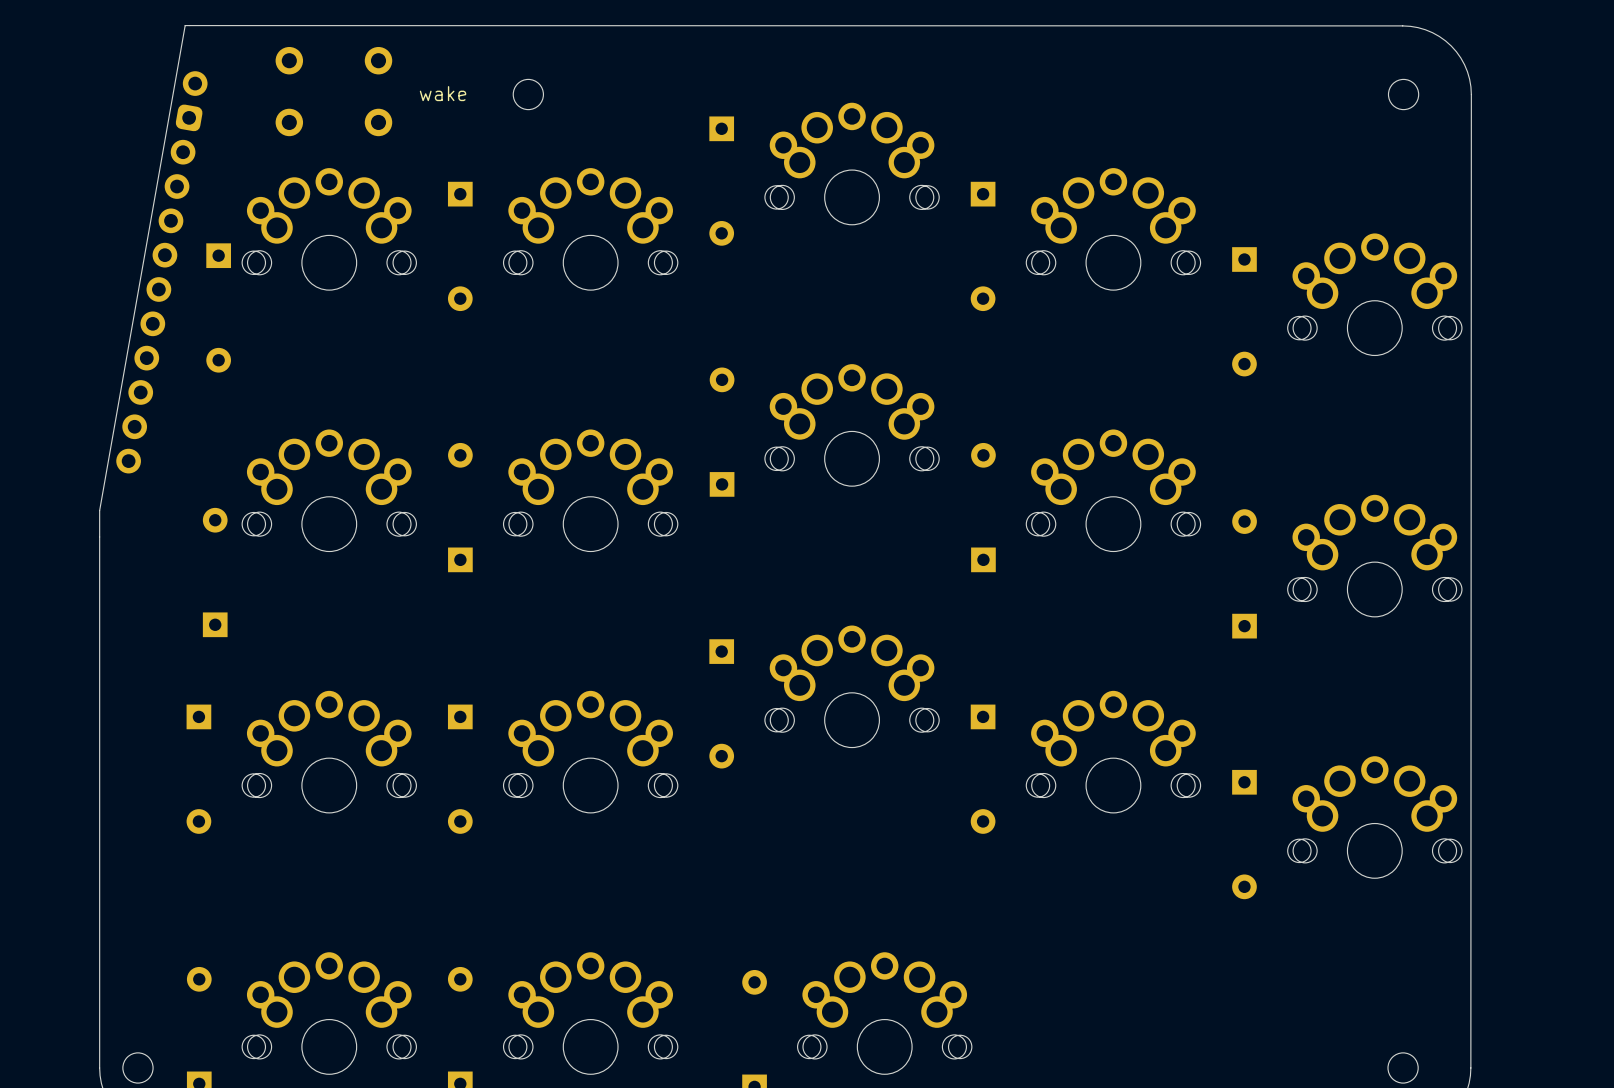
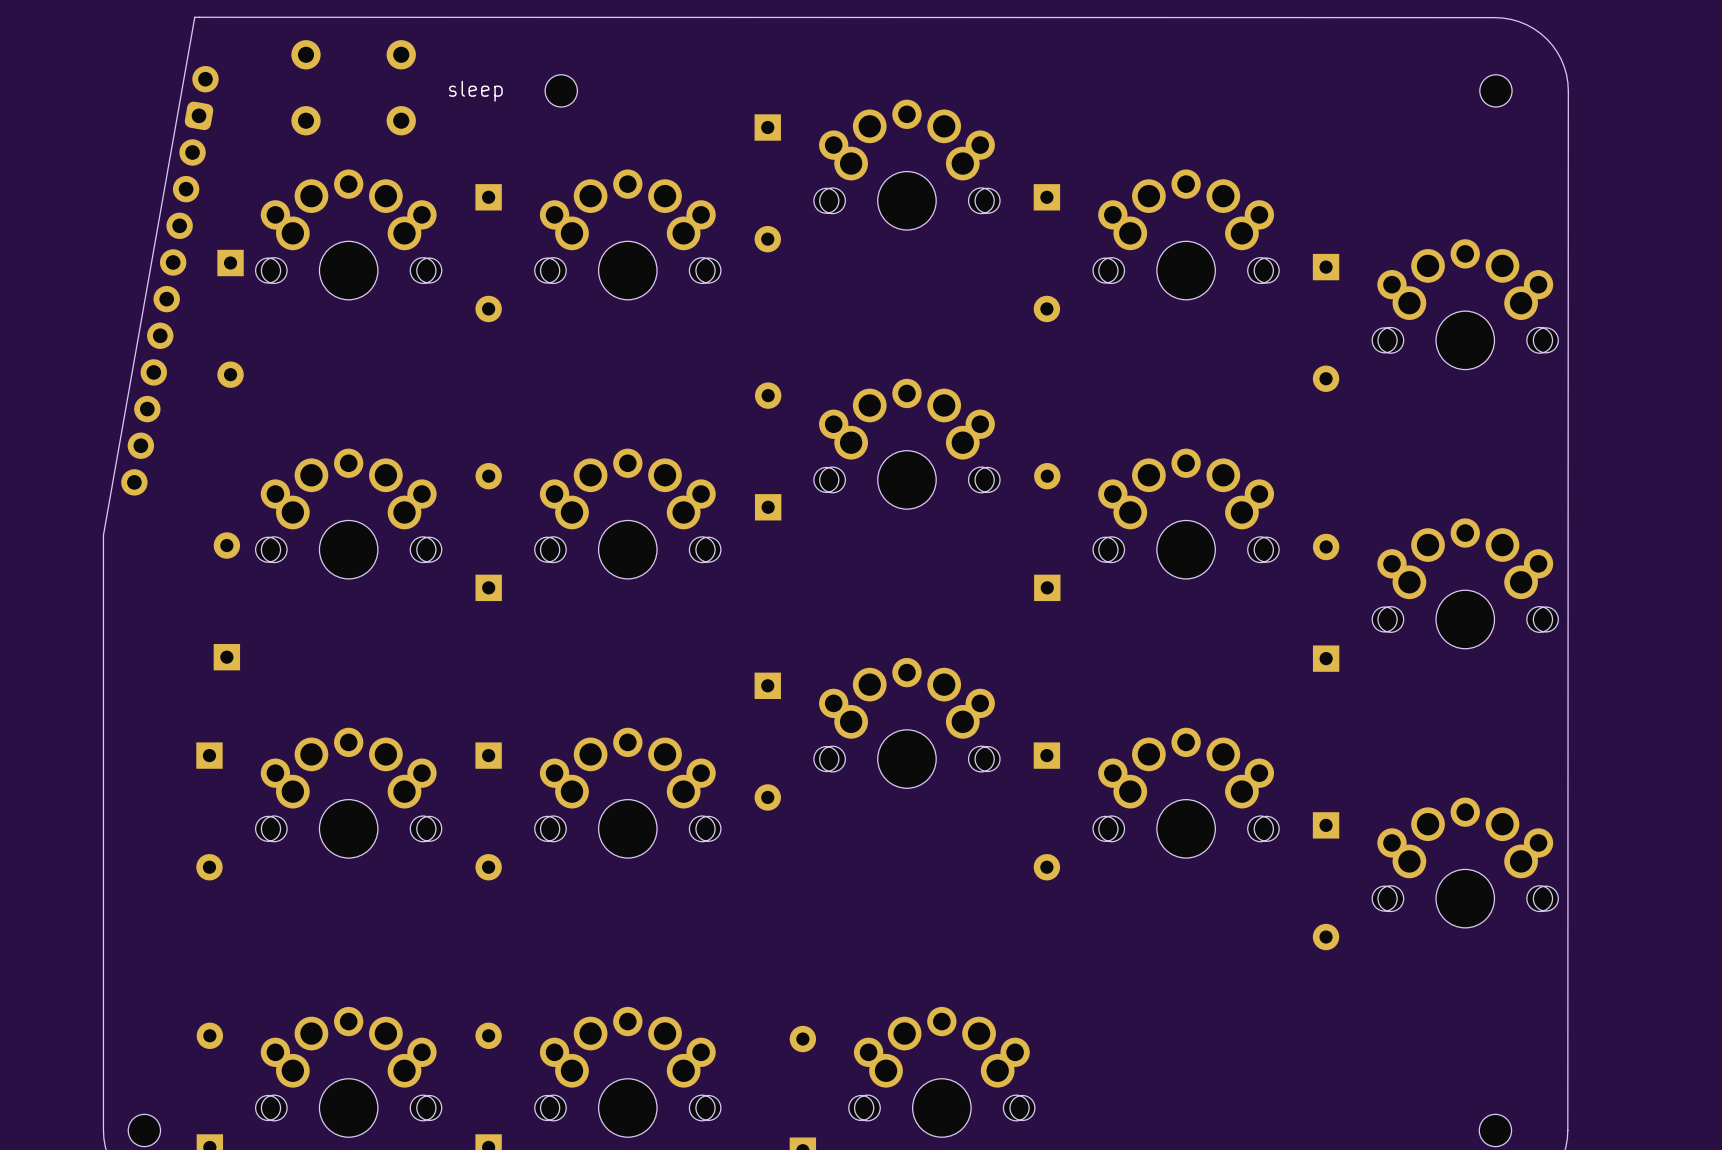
text: wake (443, 93) -> sleep (475, 91)

